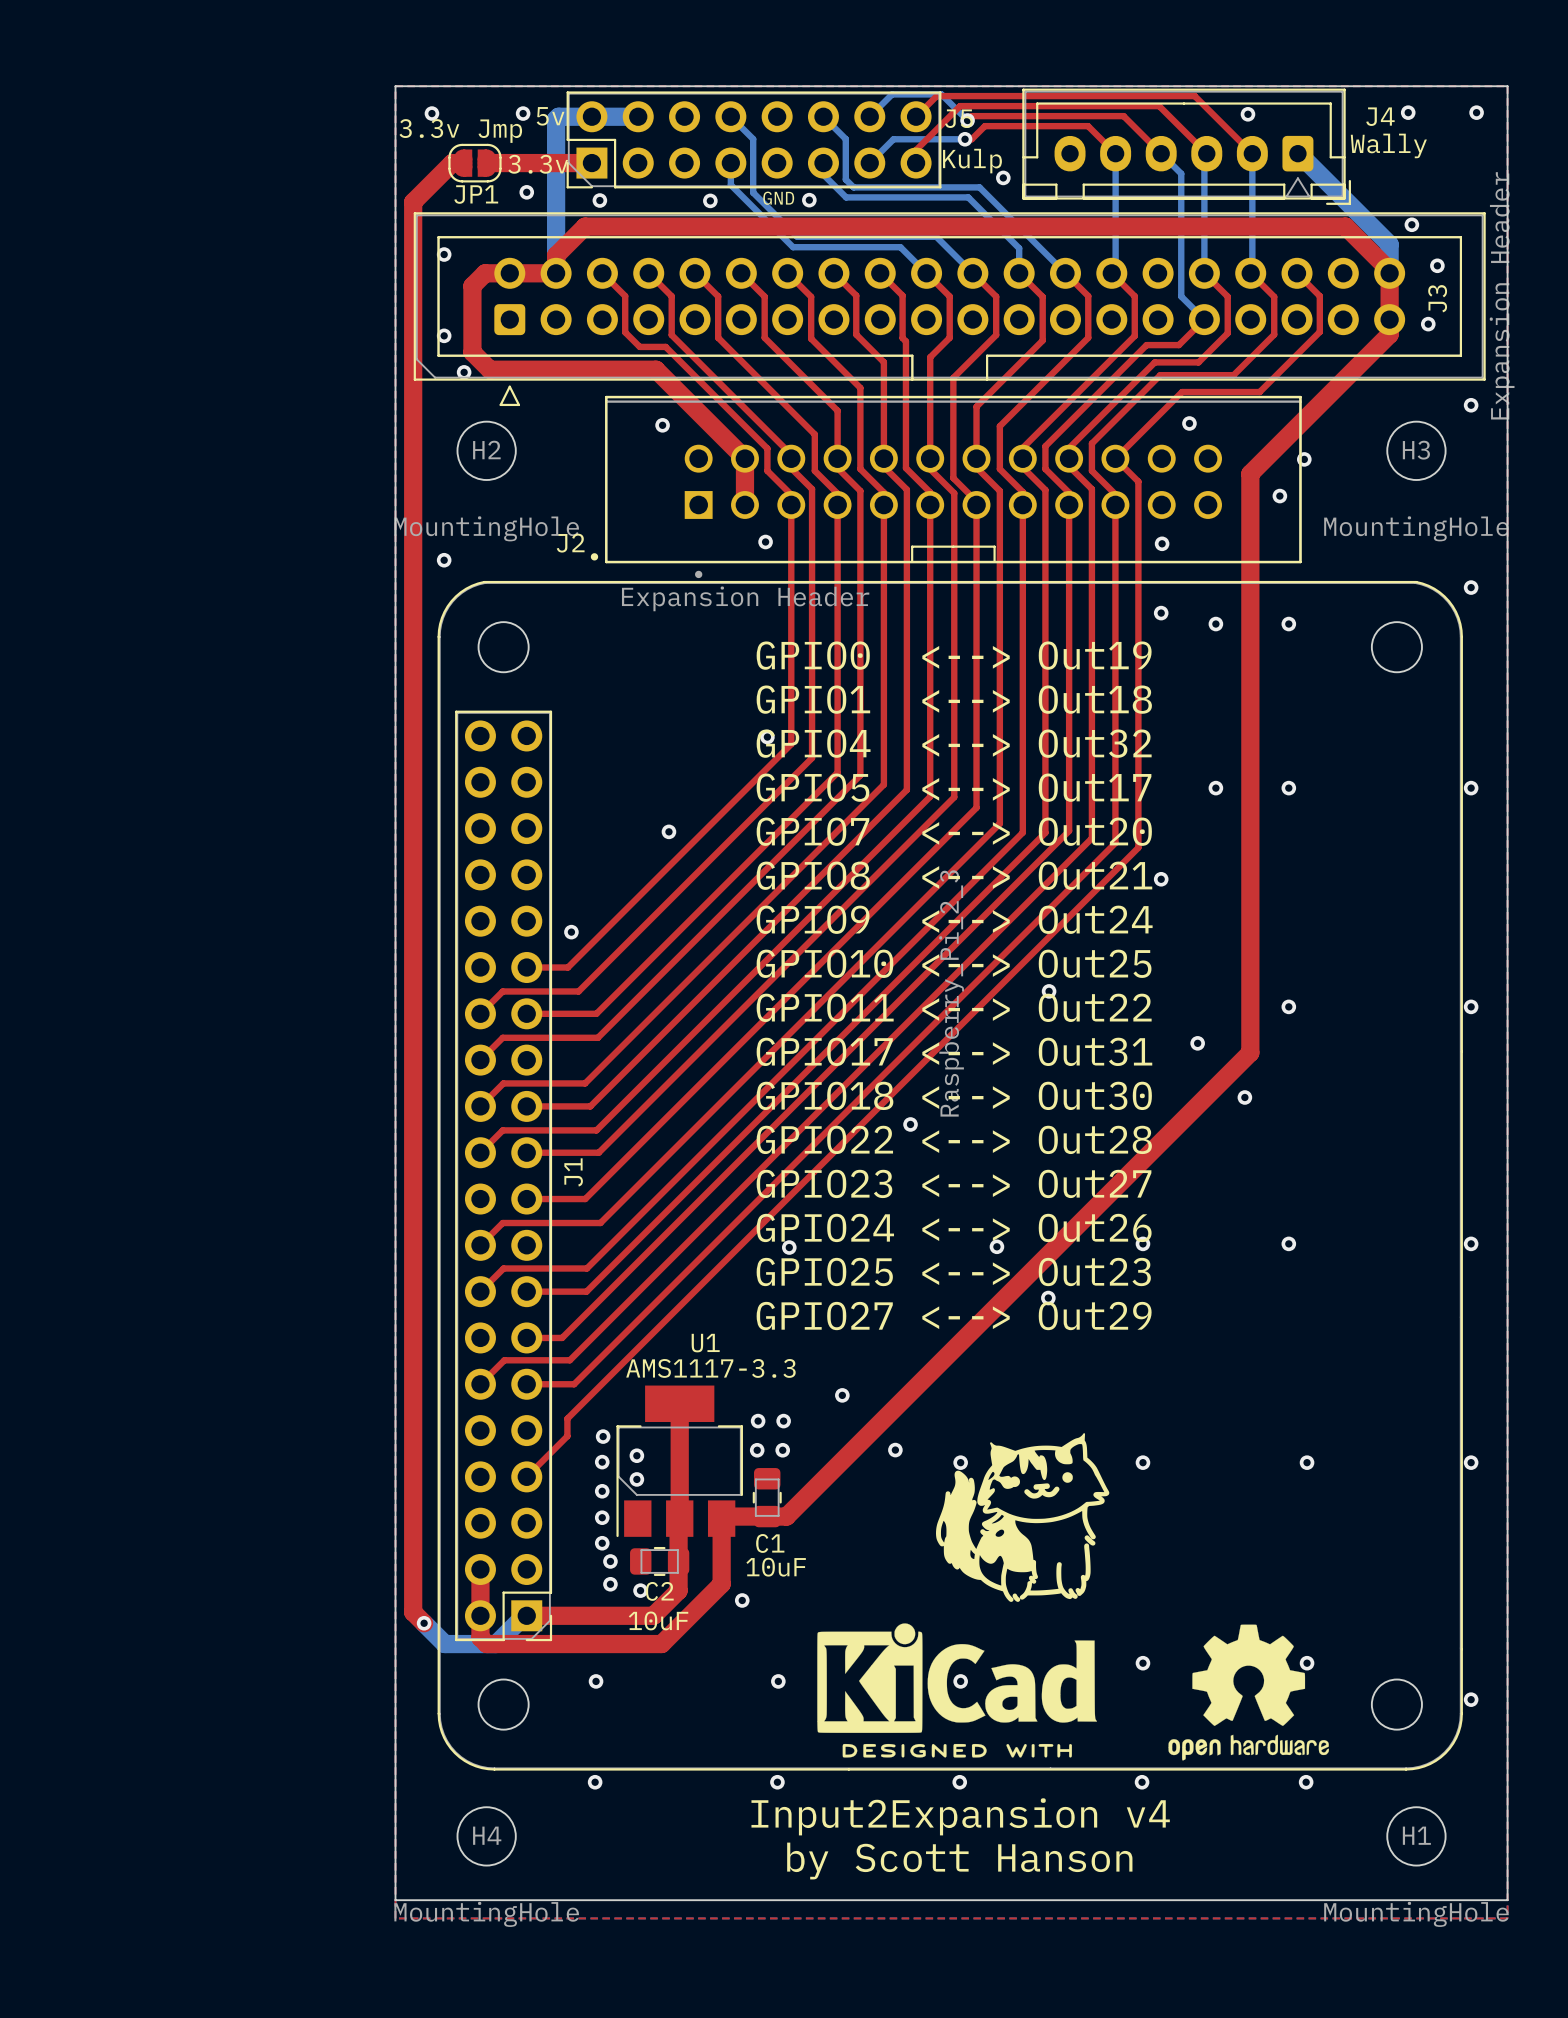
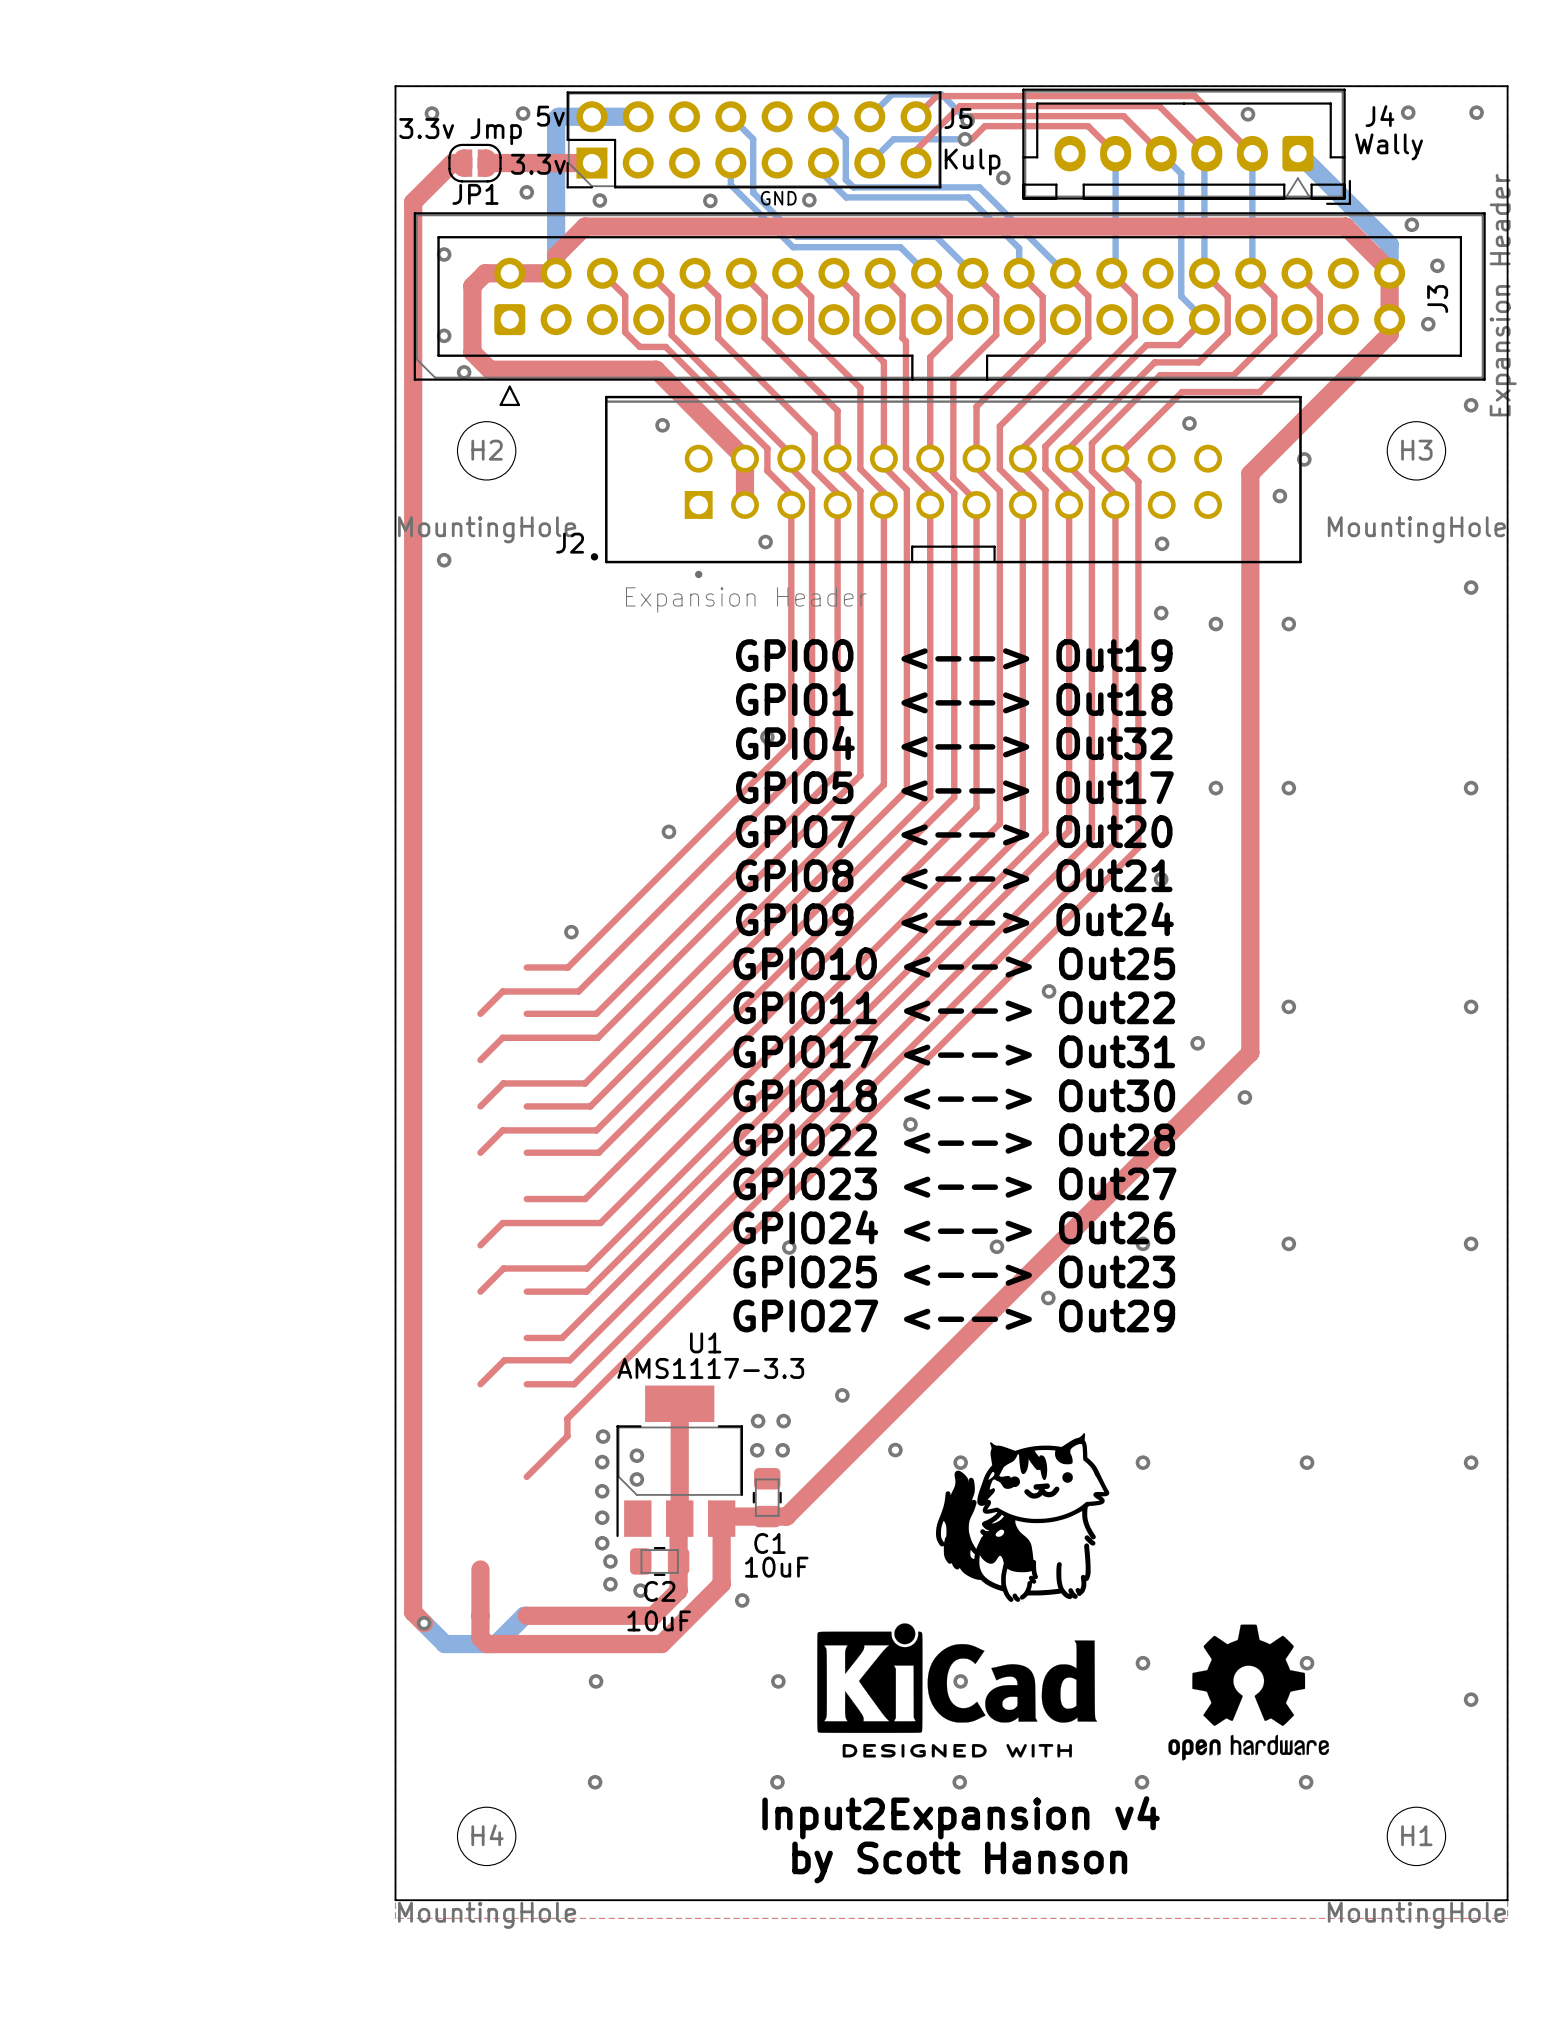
J1: Raspberry_Pi_2_3 (950, 1175) -> none

